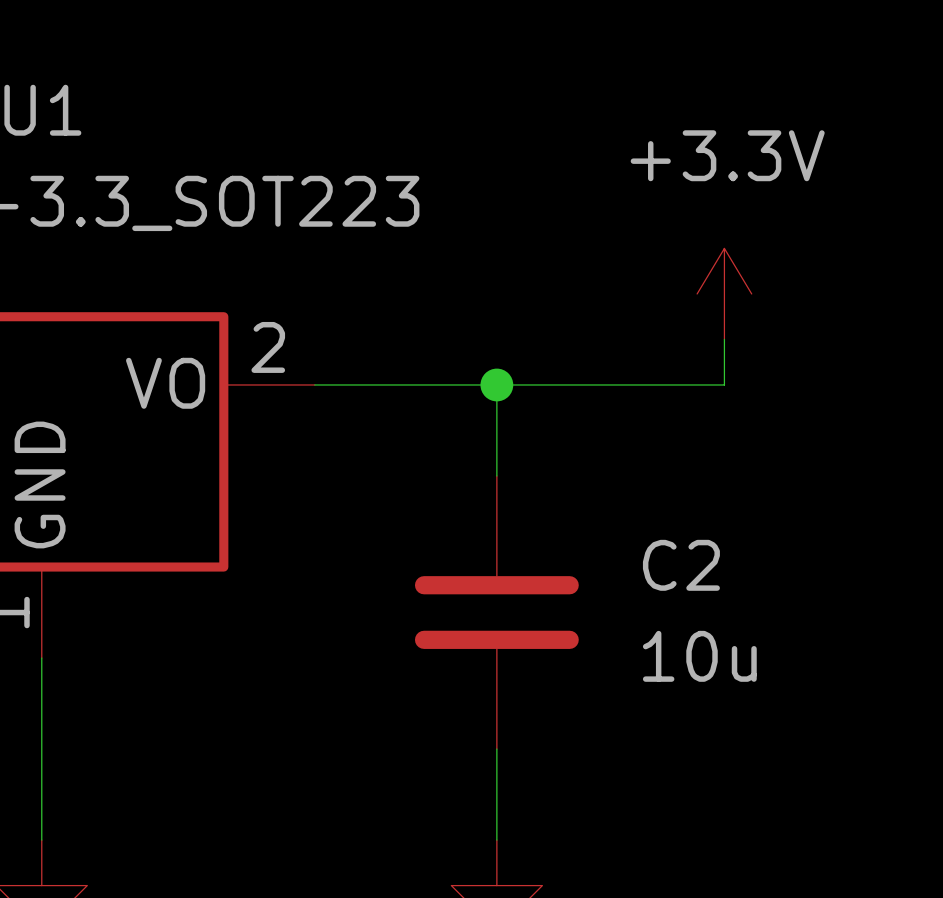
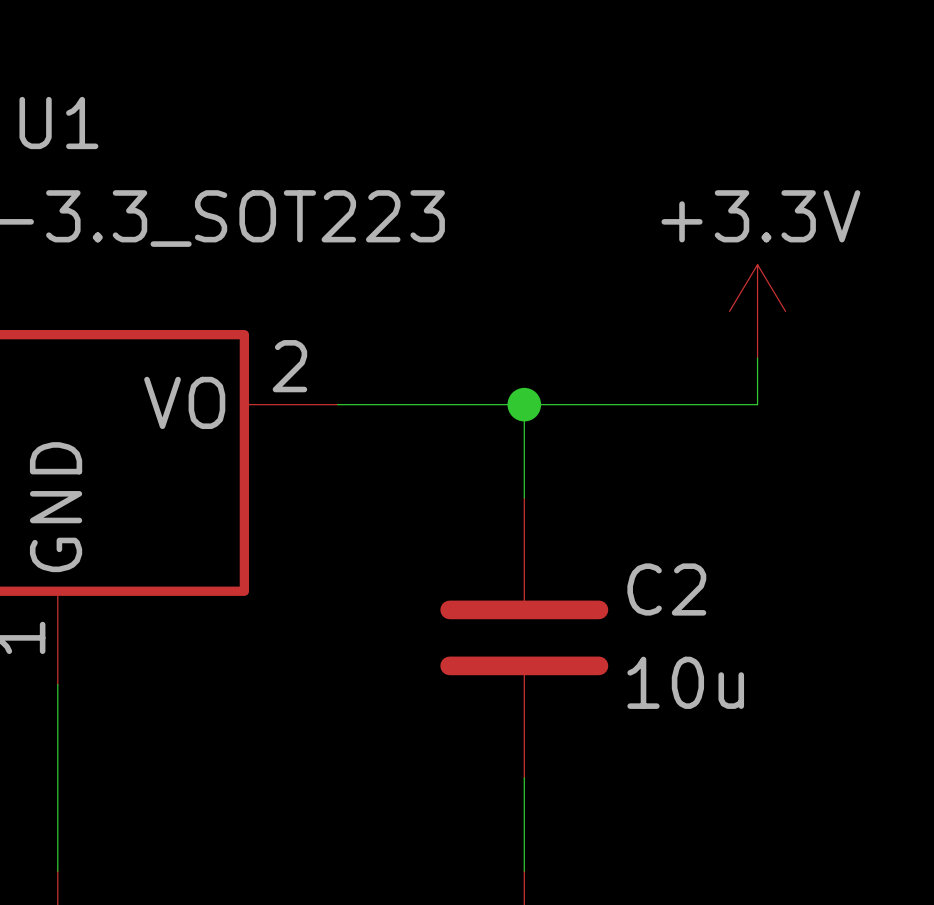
power symbol text position: +3.3V (727, 155) -> +3.3V (760, 216)
C2 name position: C2 (681, 565) -> C2 (666, 589)
C2 value position: 10u (699, 656) -> 10u (685, 682)

